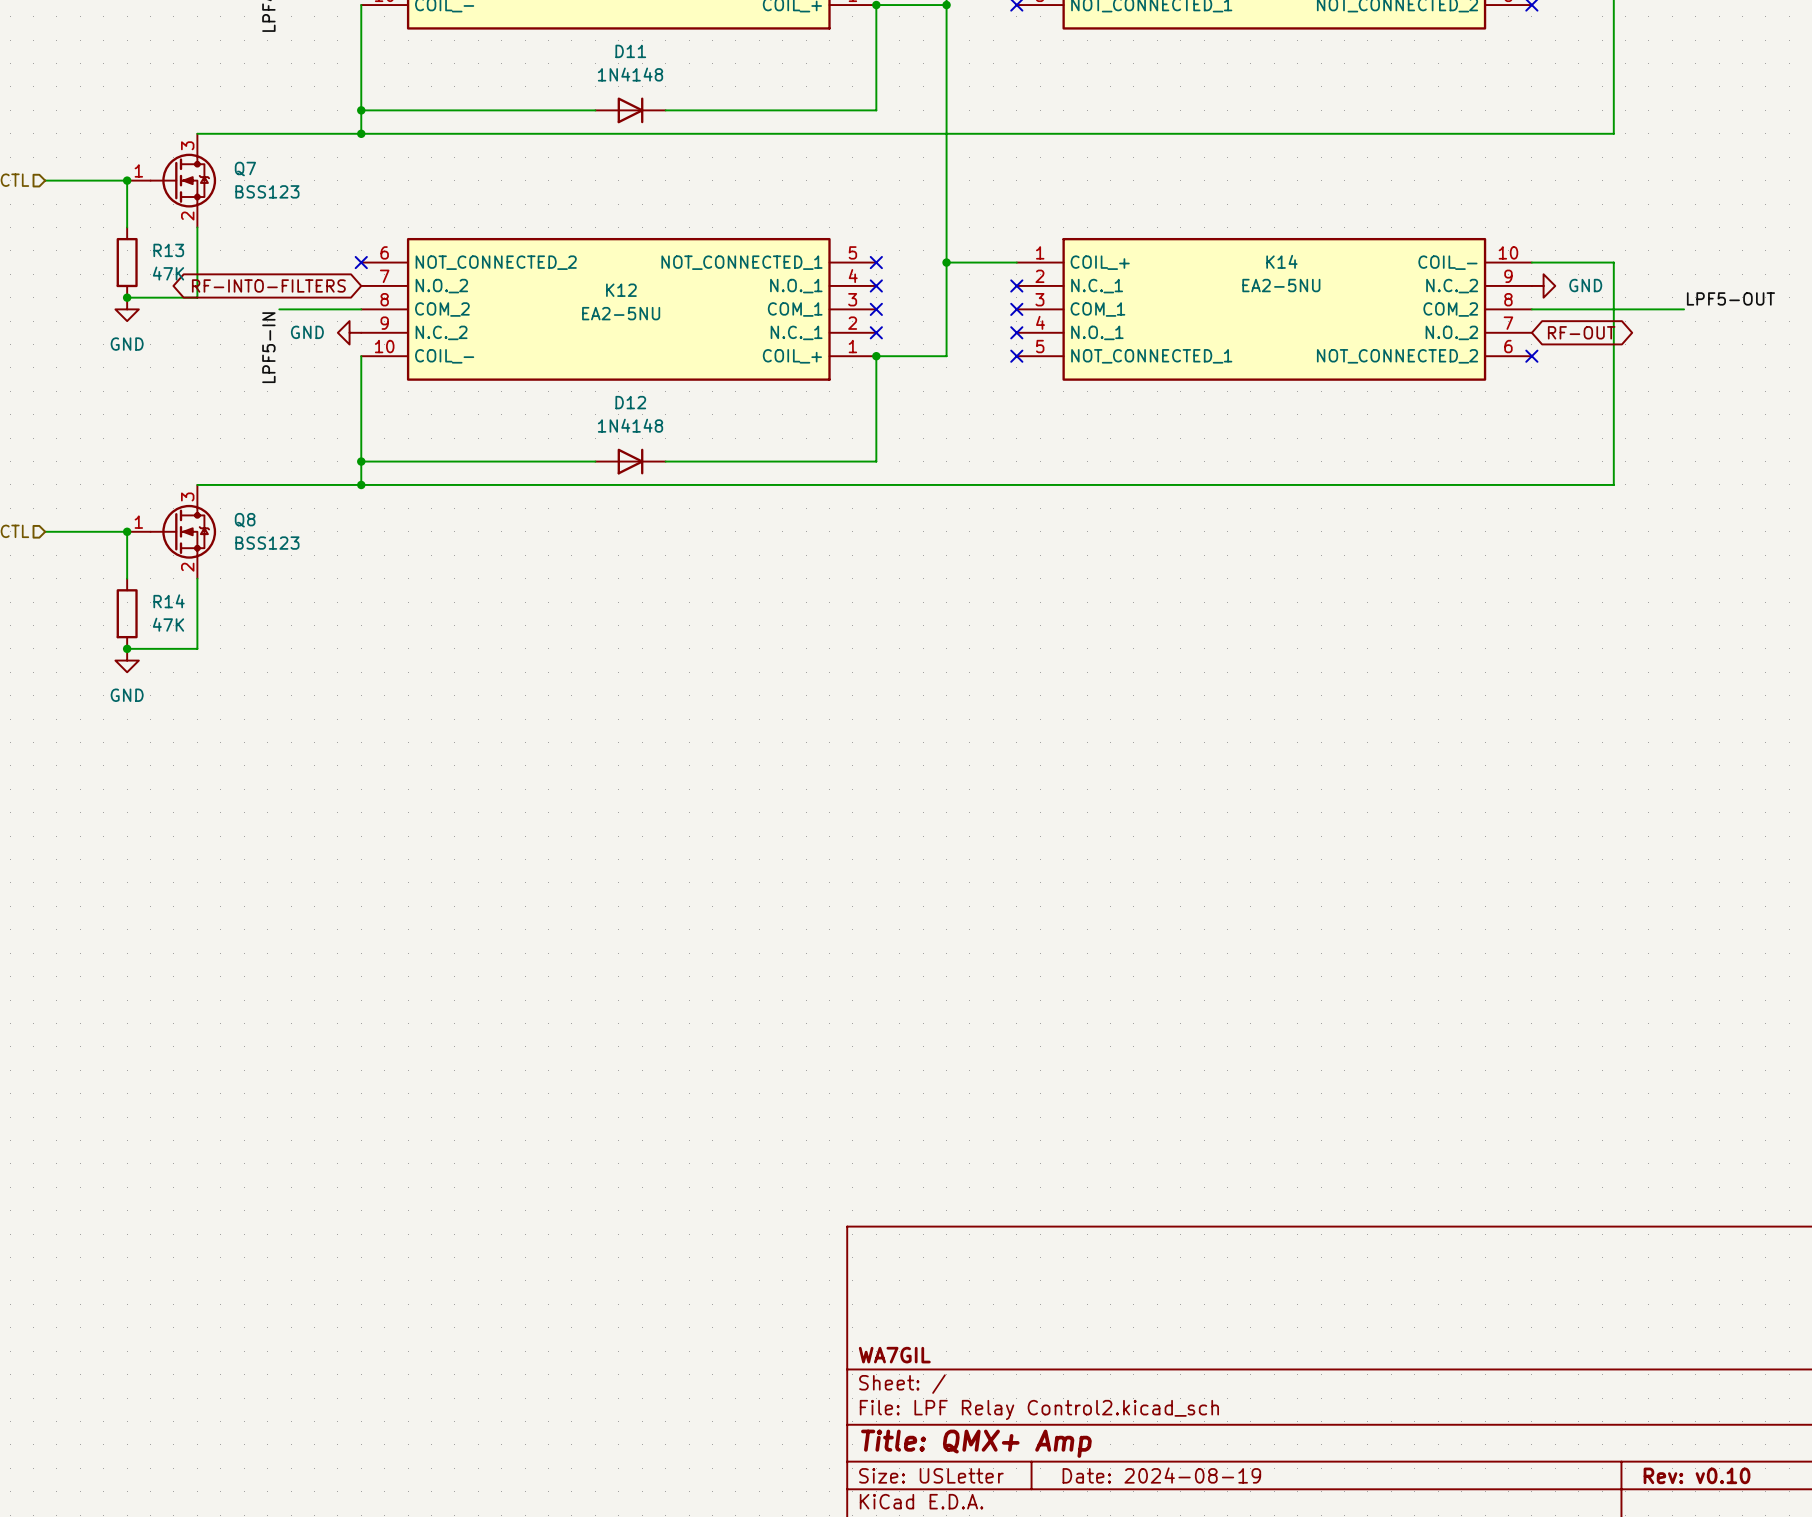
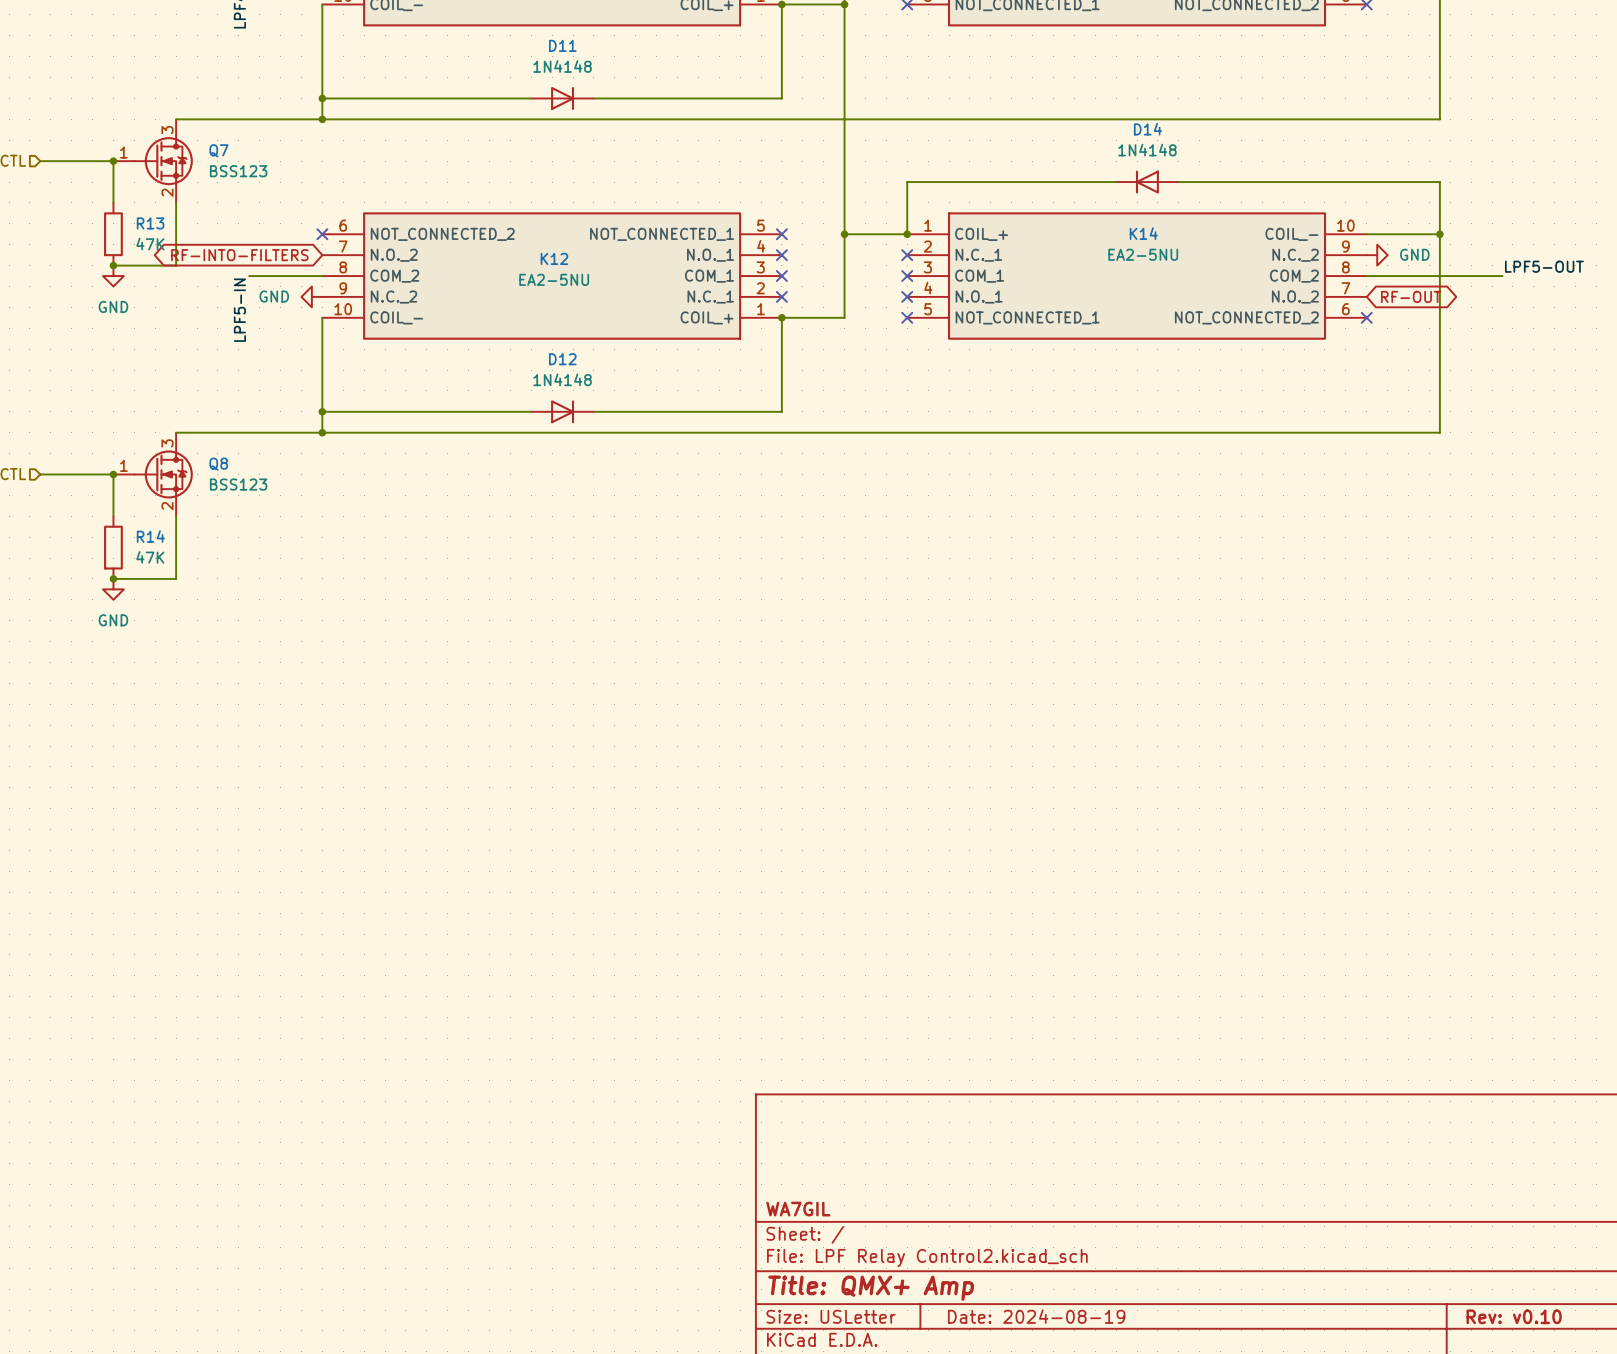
wire: none -> (1116, 182) (907, 182) (907, 234)
D14: none -> 1N4148 (1147, 182)
wire: none -> (1178, 182) (1439, 182) (1439, 234)
junction: none -> (907, 234)
junction: none -> (1439, 234)

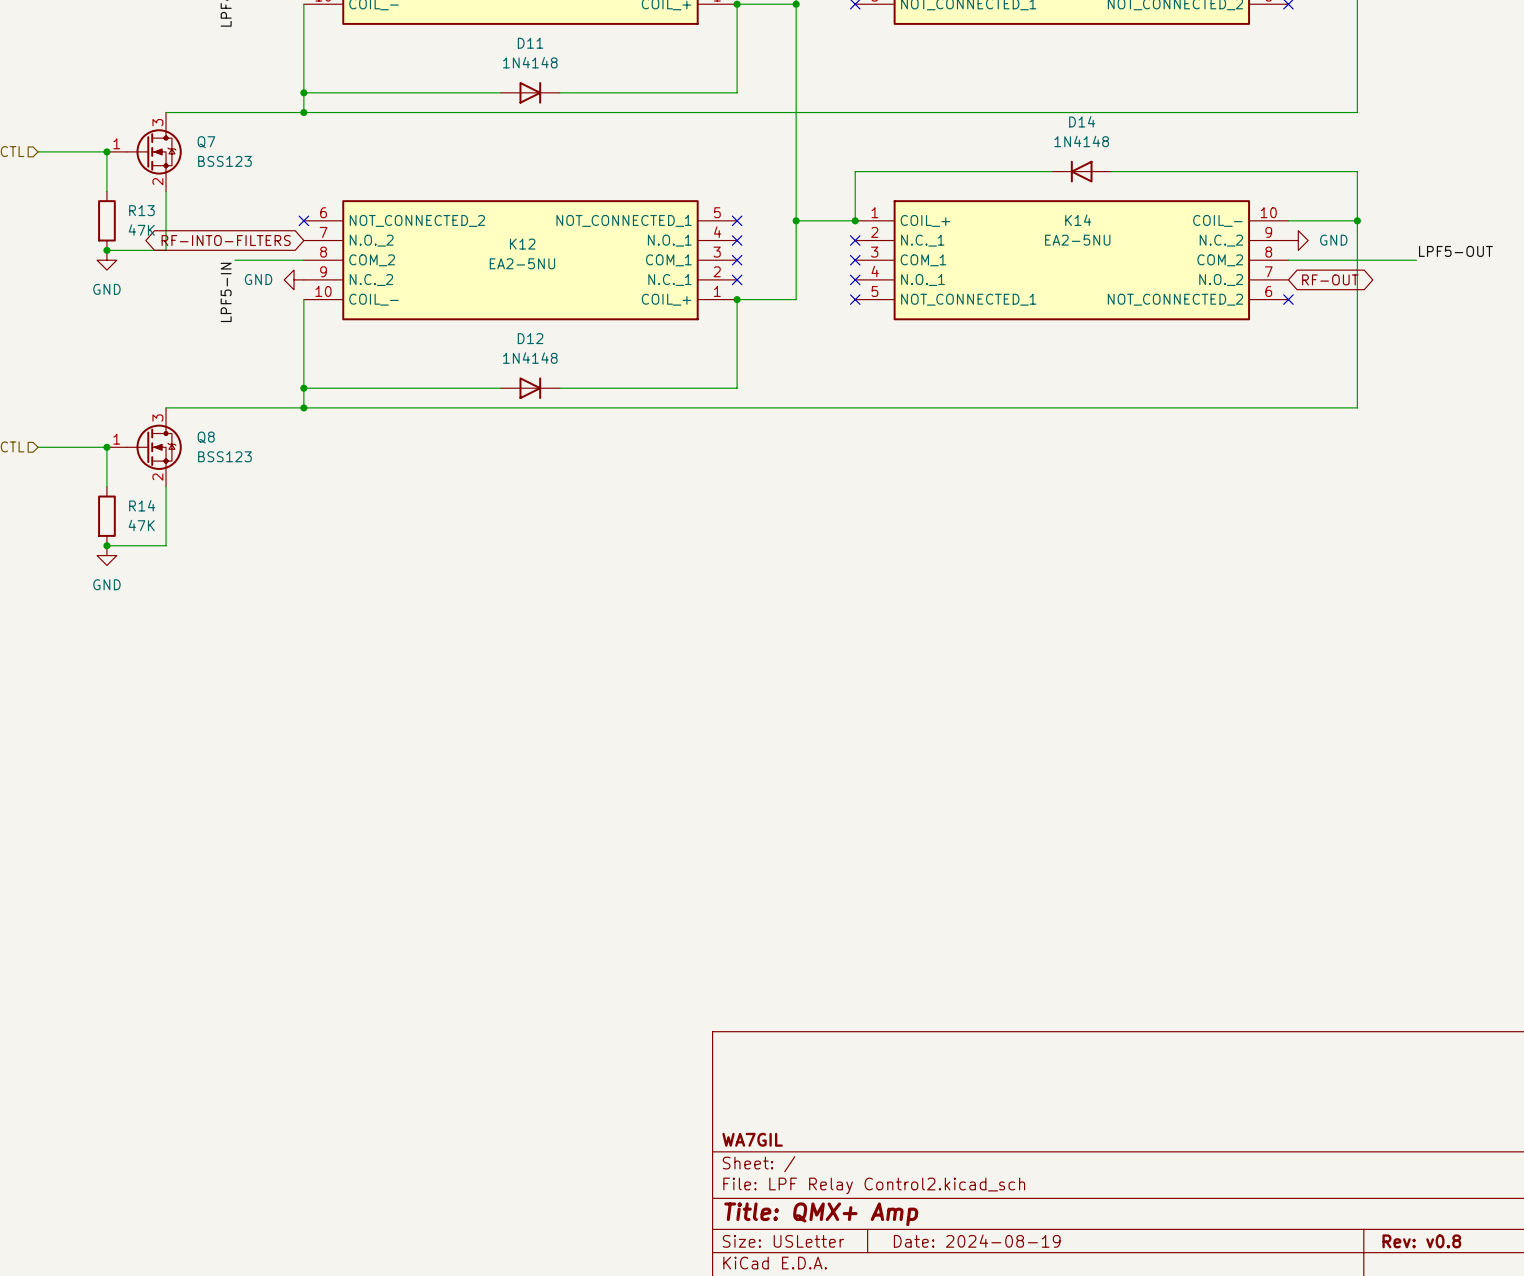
title block: Rev: v0.10 (1514, 1316) -> Rev: v0.8 (1421, 1241)

